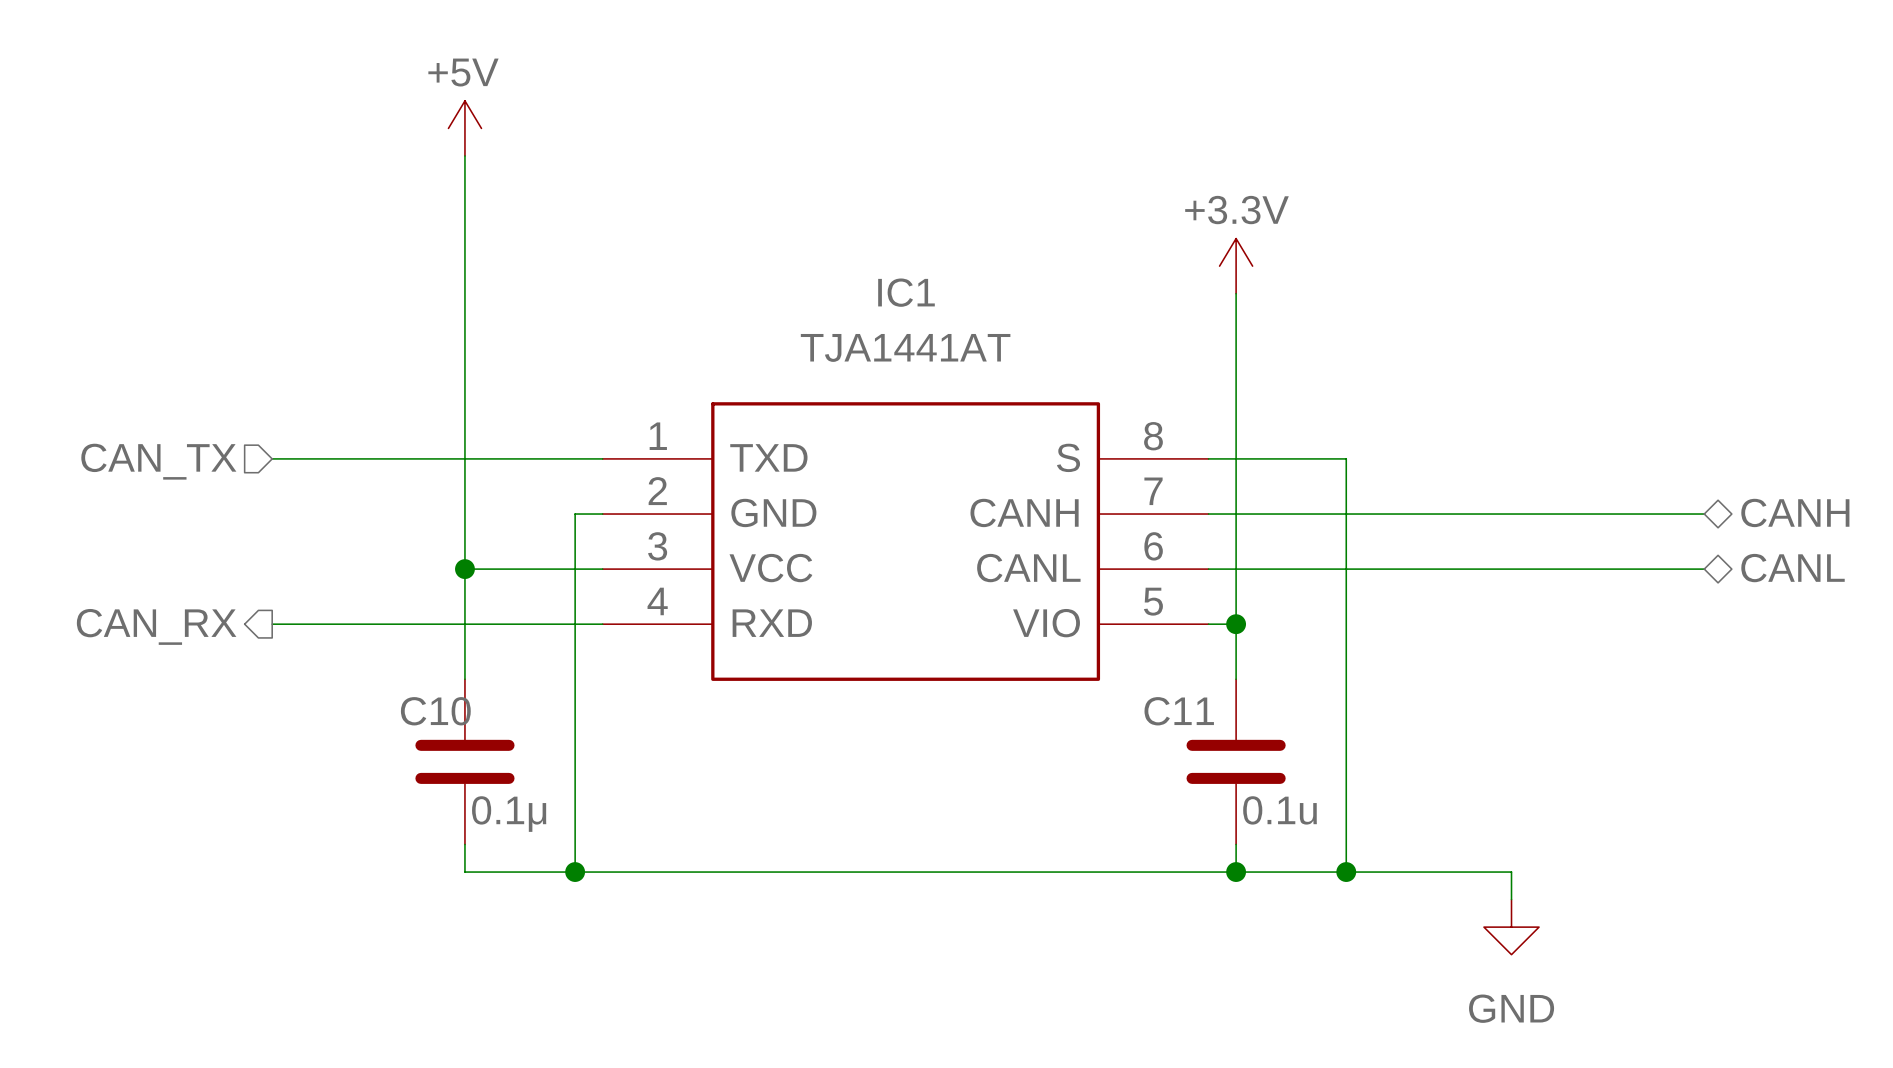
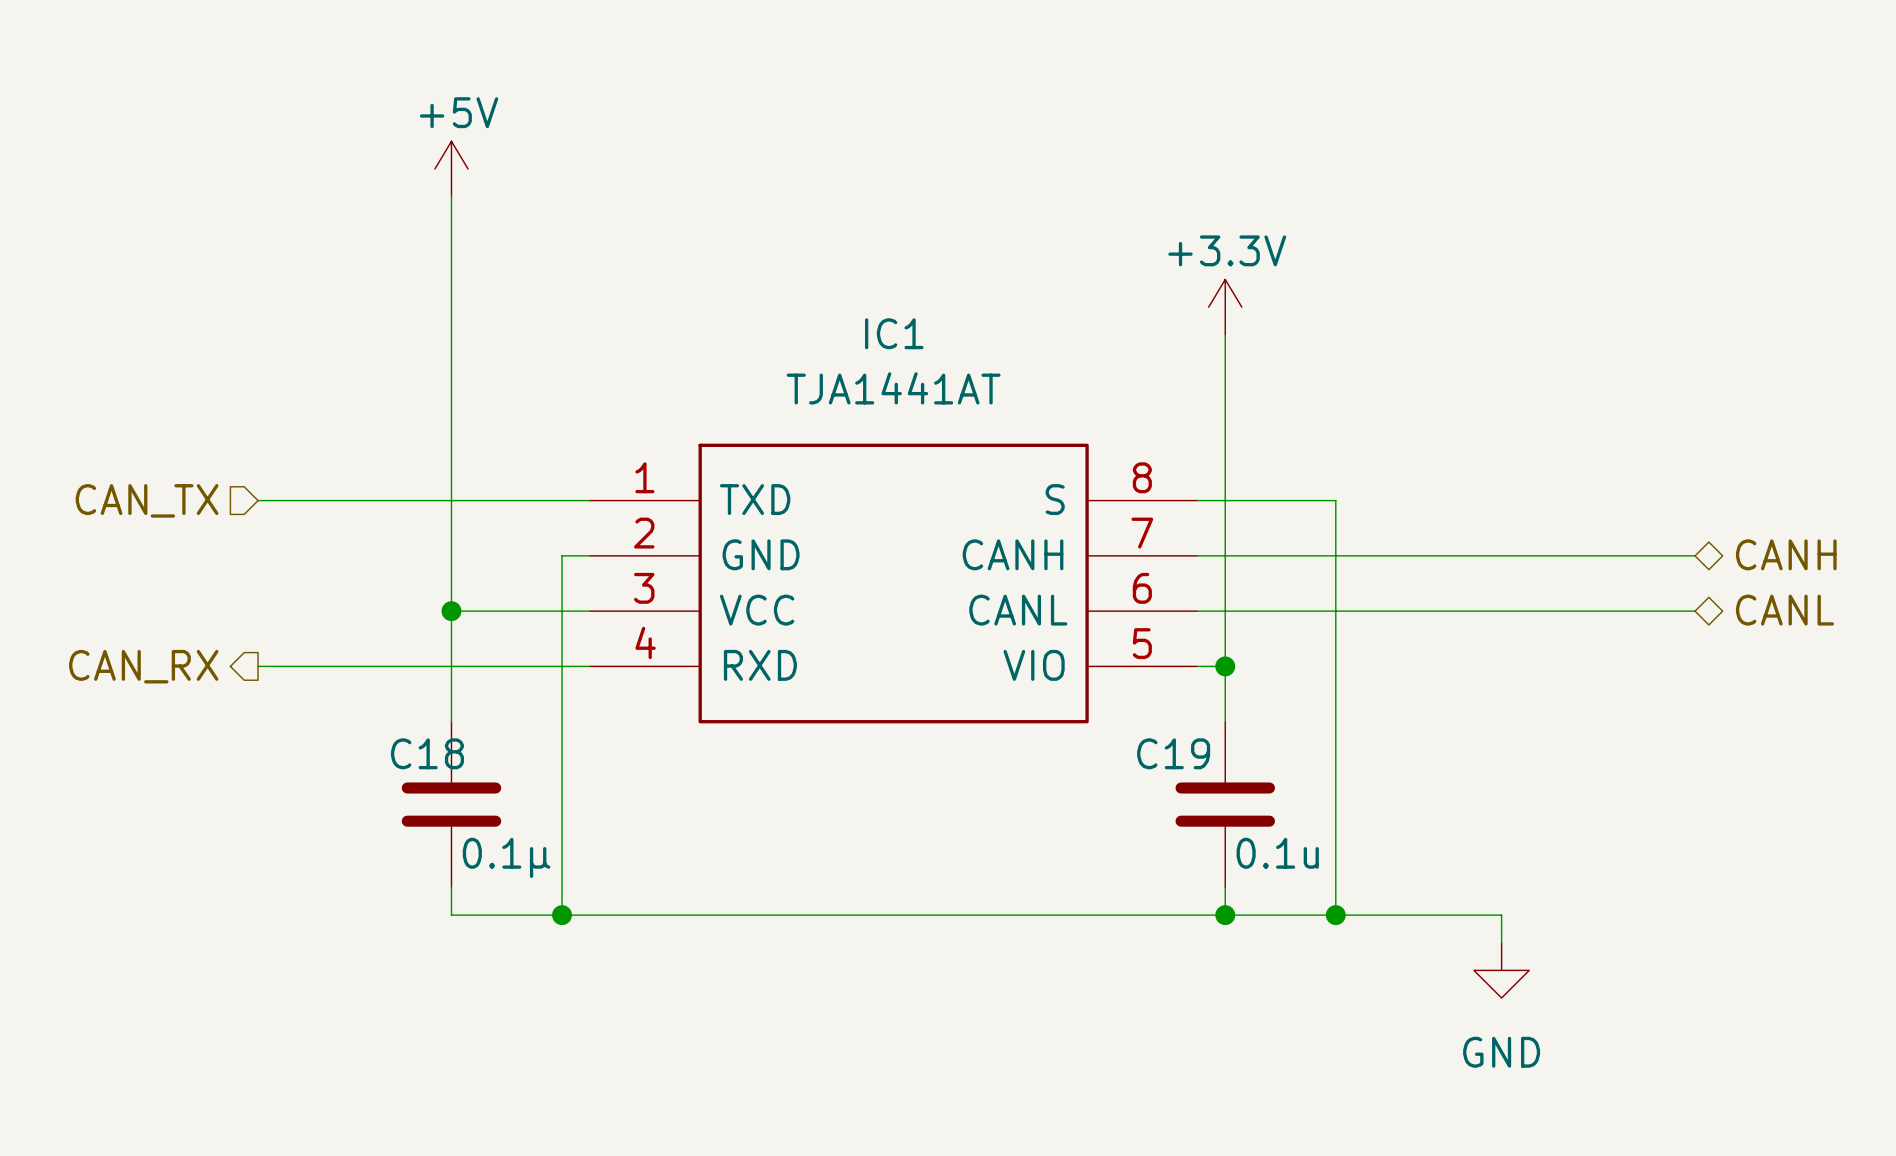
C10 name: C10 (435, 711) -> C18 (427, 753)
C11 name: C11 (1179, 711) -> C19 (1173, 753)

